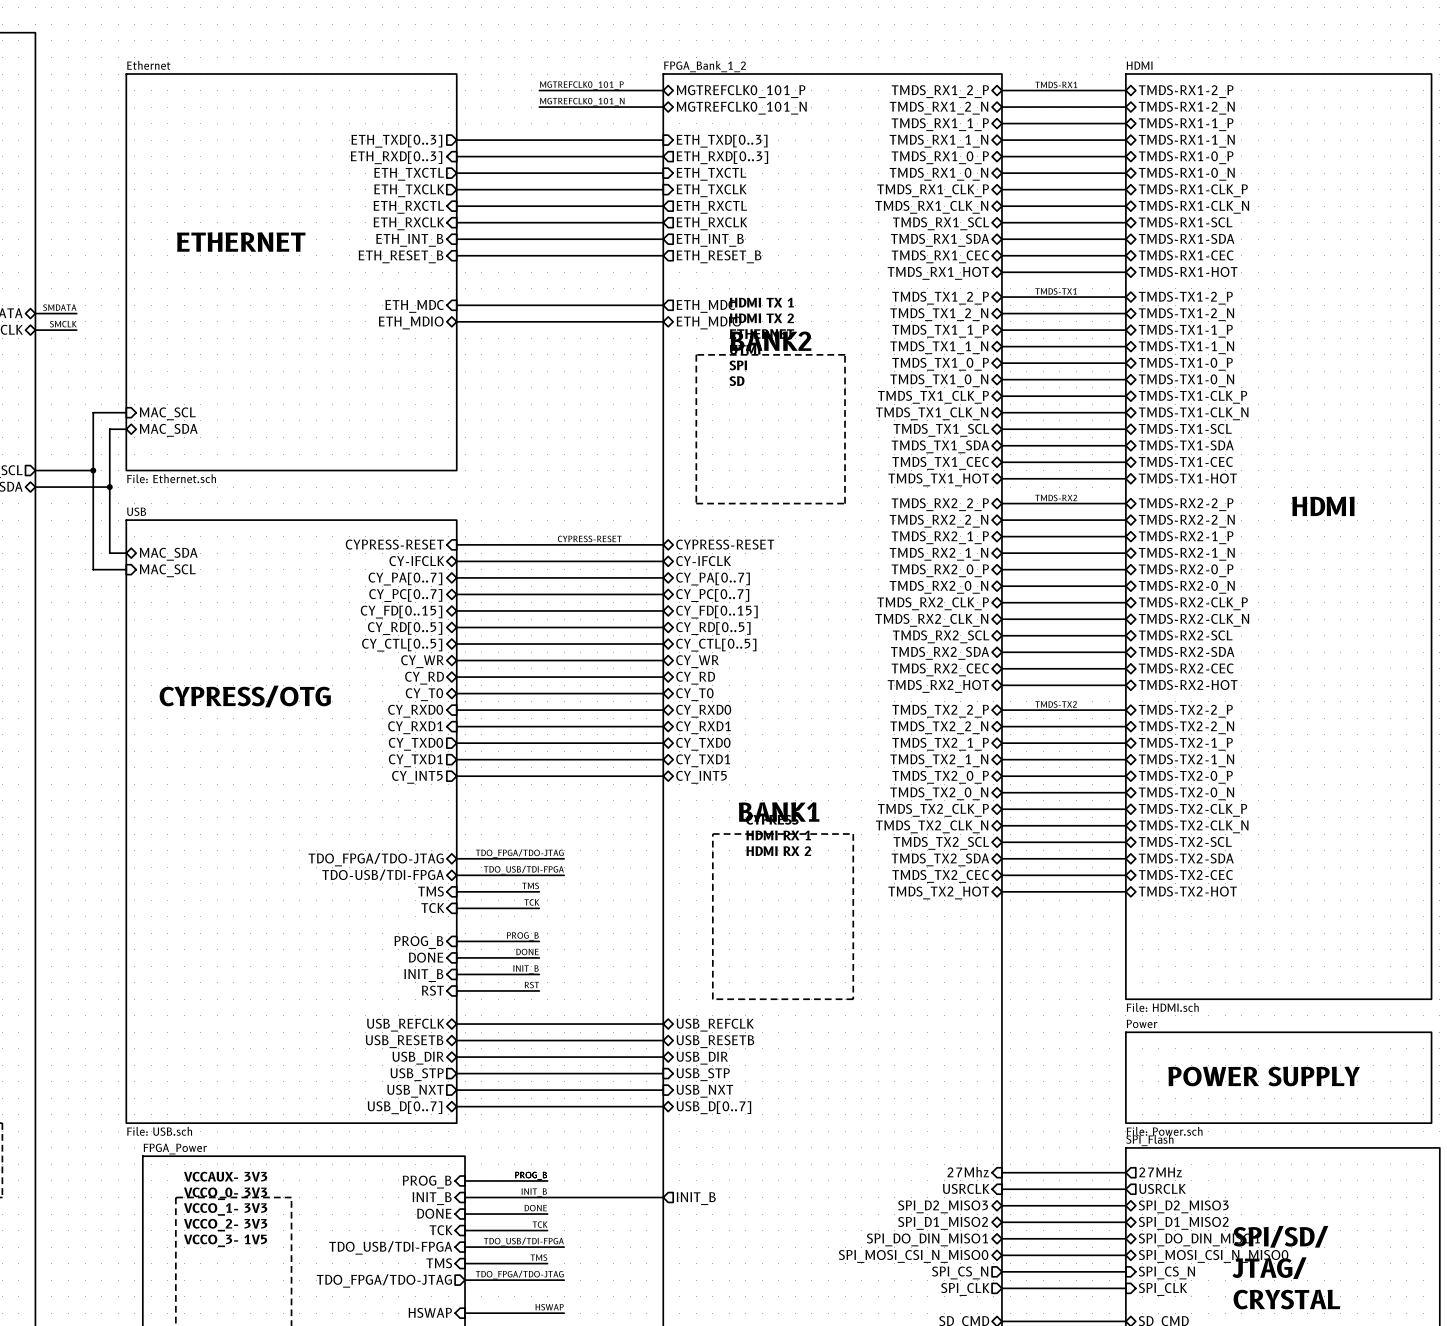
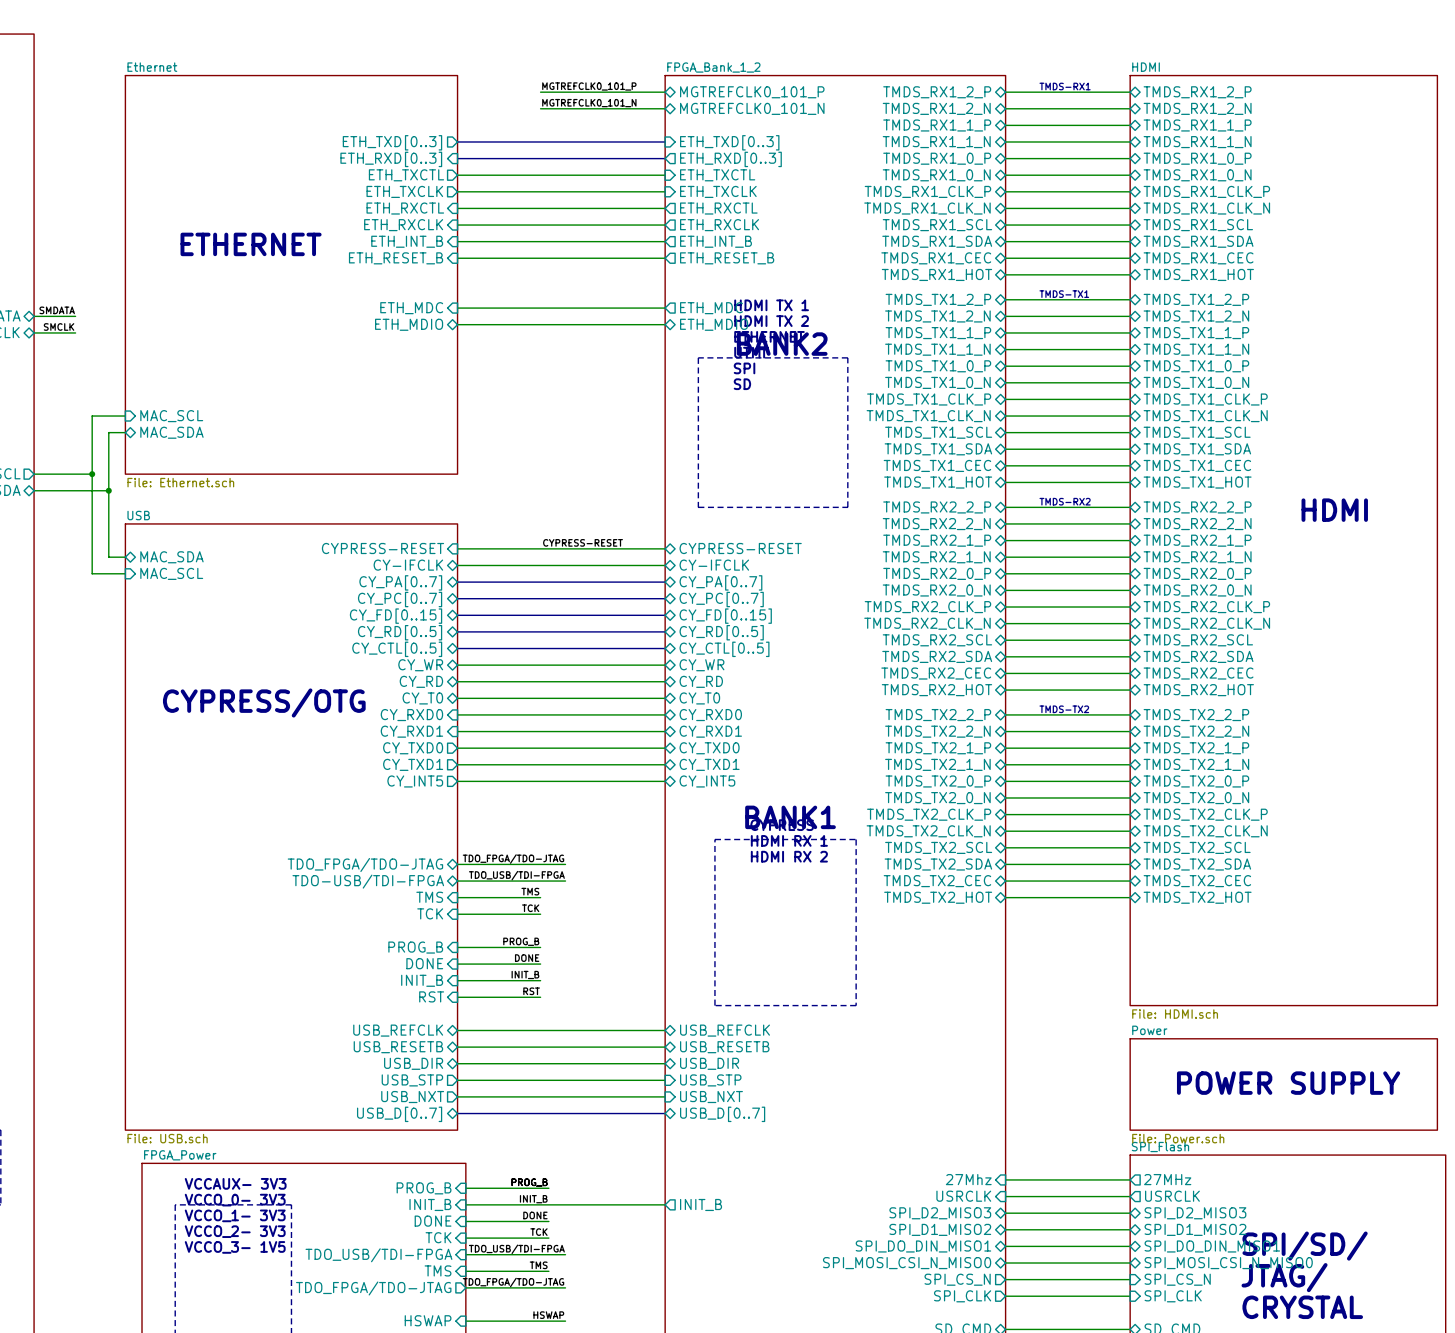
sheet pin: TMDS-RX1-2_P (1186, 91) -> TMDS_RX1_2_P (1197, 92)
sheet pin: TMDS-RX1-2_N (1186, 108) -> TMDS_RX1_2_N (1197, 108)
sheet pin: TMDS-RX1-1_P (1186, 124) -> TMDS_RX1_1_P (1197, 125)
sheet pin: TMDS-RX1-1_N (1186, 141) -> TMDS_RX1_1_N (1197, 142)
sheet pin: TMDS-RX1-0_P (1186, 157) -> TMDS_RX1_0_P (1197, 158)
sheet pin: TMDS-RX1-0_N (1186, 174) -> TMDS_RX1_0_N (1197, 175)
sheet pin: TMDS-RX1-CLK_P (1193, 190) -> TMDS_RX1_CLK_P (1206, 191)
sheet pin: TMDS-RX1-CLK_N (1193, 207) -> TMDS_RX1_CLK_N (1206, 208)
sheet pin: TMDS-RX1-SCL (1185, 222) -> TMDS_RX1_SCL (1198, 225)
sheet pin: TMDS-RX1-SDA (1186, 238) -> TMDS_RX1_SDA (1198, 241)
sheet pin: TMDS-RX1-CEC (1186, 255) -> TMDS_RX1_CEC (1198, 258)
sheet pin: TMDS-RX1-HOT (1188, 271) -> TMDS_RX1_HOT (1198, 274)
sheet pin: TMDS-TX1-2_P (1185, 298) -> TMDS_TX1_2_P (1196, 299)
sheet pin: TMDS-TX1-2_N (1186, 314) -> TMDS_TX1_2_N (1196, 316)
sheet pin: TMDS-TX1-1_P (1185, 331) -> TMDS_TX1_1_P (1196, 333)
sheet pin: TMDS-TX1-1_N (1186, 347) -> TMDS_TX1_1_N (1196, 349)
sheet pin: TMDS-TX1-0_P (1185, 364) -> TMDS_TX1_0_P (1196, 366)
sheet pin: TMDS-TX1-0_N (1186, 380) -> TMDS_TX1_0_N (1196, 382)
sheet pin: TMDS-TX1-CLK_P (1192, 397) -> TMDS_TX1_CLK_P (1205, 399)
sheet pin: TMDS-TX1-CLK_N (1193, 413) -> TMDS_TX1_CLK_N (1205, 416)
sheet pin: TMDS-TX1-SCL (1185, 428) -> TMDS_TX1_SCL (1197, 432)
sheet pin: TMDS-TX1-SDA (1186, 445) -> TMDS_TX1_SDA (1197, 449)
sheet pin: TMDS-TX1-CEC (1185, 461) -> TMDS_TX1_CEC (1197, 465)
sheet pin: TMDS-TX1-HOT (1187, 478) -> TMDS_TX1_HOT (1197, 482)
sheet pin: TMDS-RX2-2_P (1186, 504) -> TMDS_RX2_2_P (1197, 507)
sheet pin: TMDS-RX2-2_N (1186, 521) -> TMDS_RX2_2_N (1197, 524)
sheet pin: TMDS-RX2-1_P (1186, 537) -> TMDS_RX2_1_P (1197, 540)
sheet pin: TMDS-RX2-1_N (1186, 554) -> TMDS_RX2_1_N (1197, 557)
sheet pin: TMDS-RX2-0_P (1186, 570) -> TMDS_RX2_0_P (1197, 573)
sheet pin: TMDS-RX2-0_N (1186, 587) -> TMDS_RX2_0_N (1197, 590)
sheet pin: TMDS-RX2-CLK_P (1193, 603) -> TMDS_RX2_CLK_P (1206, 607)
sheet pin: TMDS-RX2-CLK_N (1193, 620) -> TMDS_RX2_CLK_N (1206, 623)
sheet pin: TMDS-RX2-SCL (1185, 635) -> TMDS_RX2_SCL (1198, 640)
sheet pin: TMDS-RX2-SDA (1186, 651) -> TMDS_RX2_SDA (1198, 656)
sheet pin: TMDS-RX2-CEC (1186, 668) -> TMDS_RX2_CEC (1198, 673)
sheet pin: TMDS-RX2-HOT (1188, 685) -> TMDS_RX2_HOT (1198, 690)
sheet pin: TMDS-TX2-2_P (1185, 711) -> TMDS_TX2_2_P (1196, 715)
sheet pin: TMDS-TX2-2_N (1186, 727) -> TMDS_TX2_2_N (1196, 731)
sheet pin: TMDS-TX2-1_P (1185, 744) -> TMDS_TX2_1_P (1196, 748)
sheet pin: TMDS-TX2-1_N (1186, 760) -> TMDS_TX2_1_N (1196, 764)
sheet pin: TMDS-TX2-0_P (1185, 777) -> TMDS_TX2_0_P (1196, 781)
sheet pin: TMDS-TX2-0_N (1186, 793) -> TMDS_TX2_0_N (1196, 798)
sheet pin: TMDS-TX2-CLK_P (1192, 810) -> TMDS_TX2_CLK_P (1205, 814)
sheet pin: TMDS-TX2-CLK_N (1193, 826) -> TMDS_TX2_CLK_N (1205, 831)
sheet pin: TMDS-TX2-SCL (1185, 841) -> TMDS_TX2_SCL (1197, 847)
sheet pin: TMDS-TX2-SDA (1186, 858) -> TMDS_TX2_SDA (1197, 864)
sheet pin: TMDS-TX2-CEC (1185, 875) -> TMDS_TX2_CEC (1197, 881)
sheet pin: TMDS-TX2-HOT (1187, 891) -> TMDS_TX2_HOT (1197, 897)

